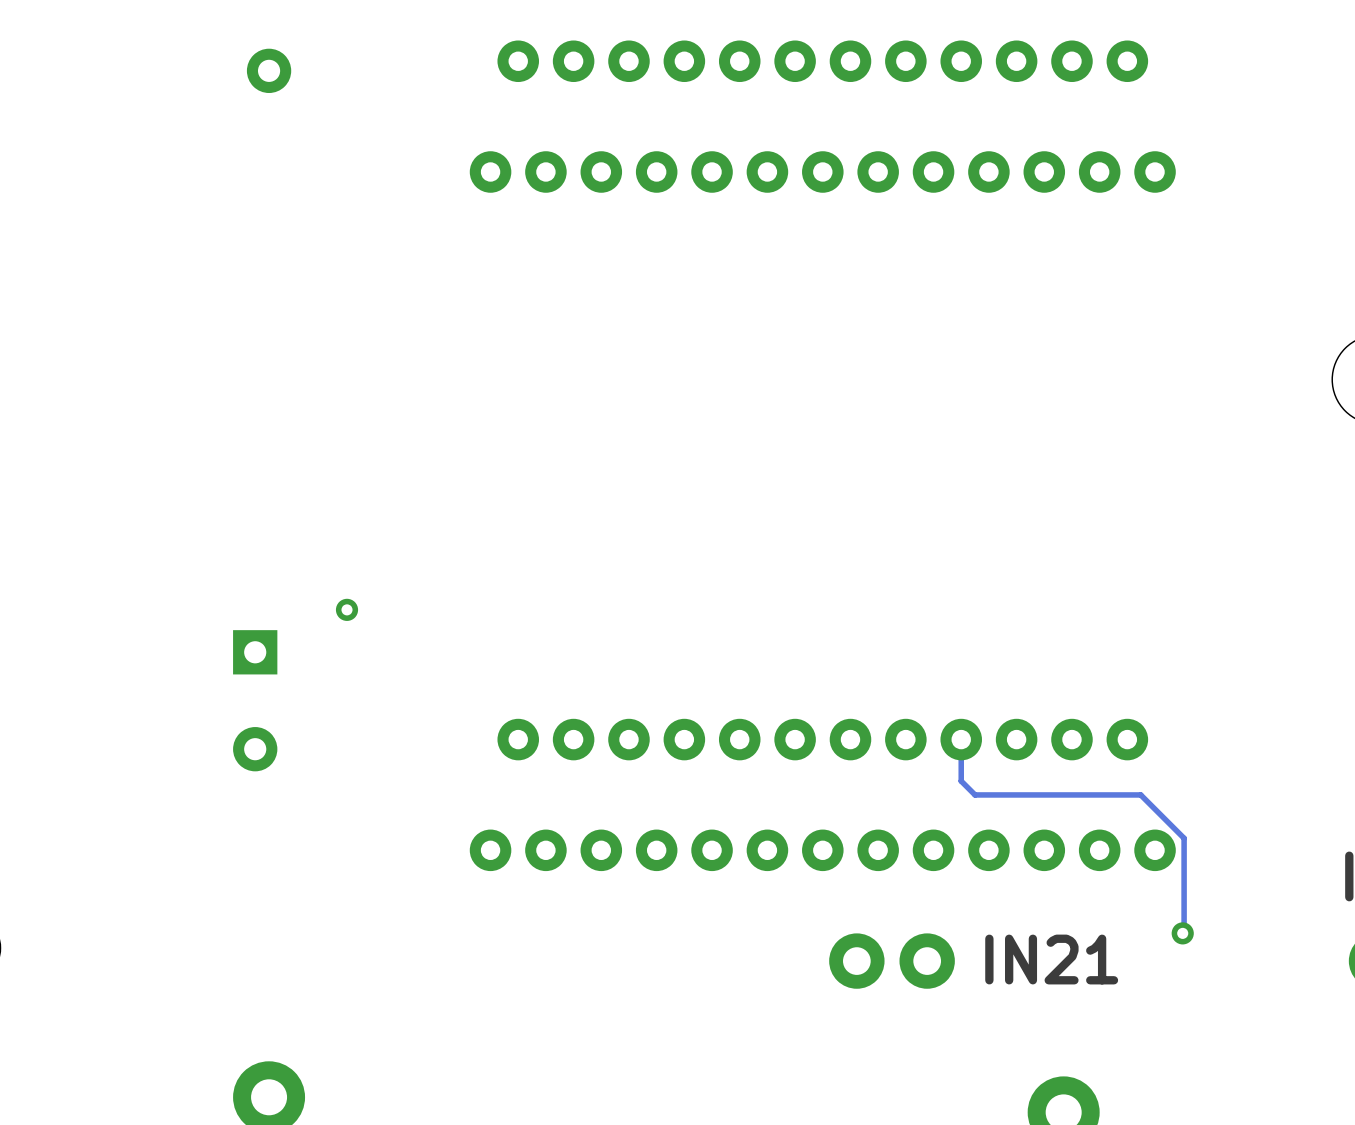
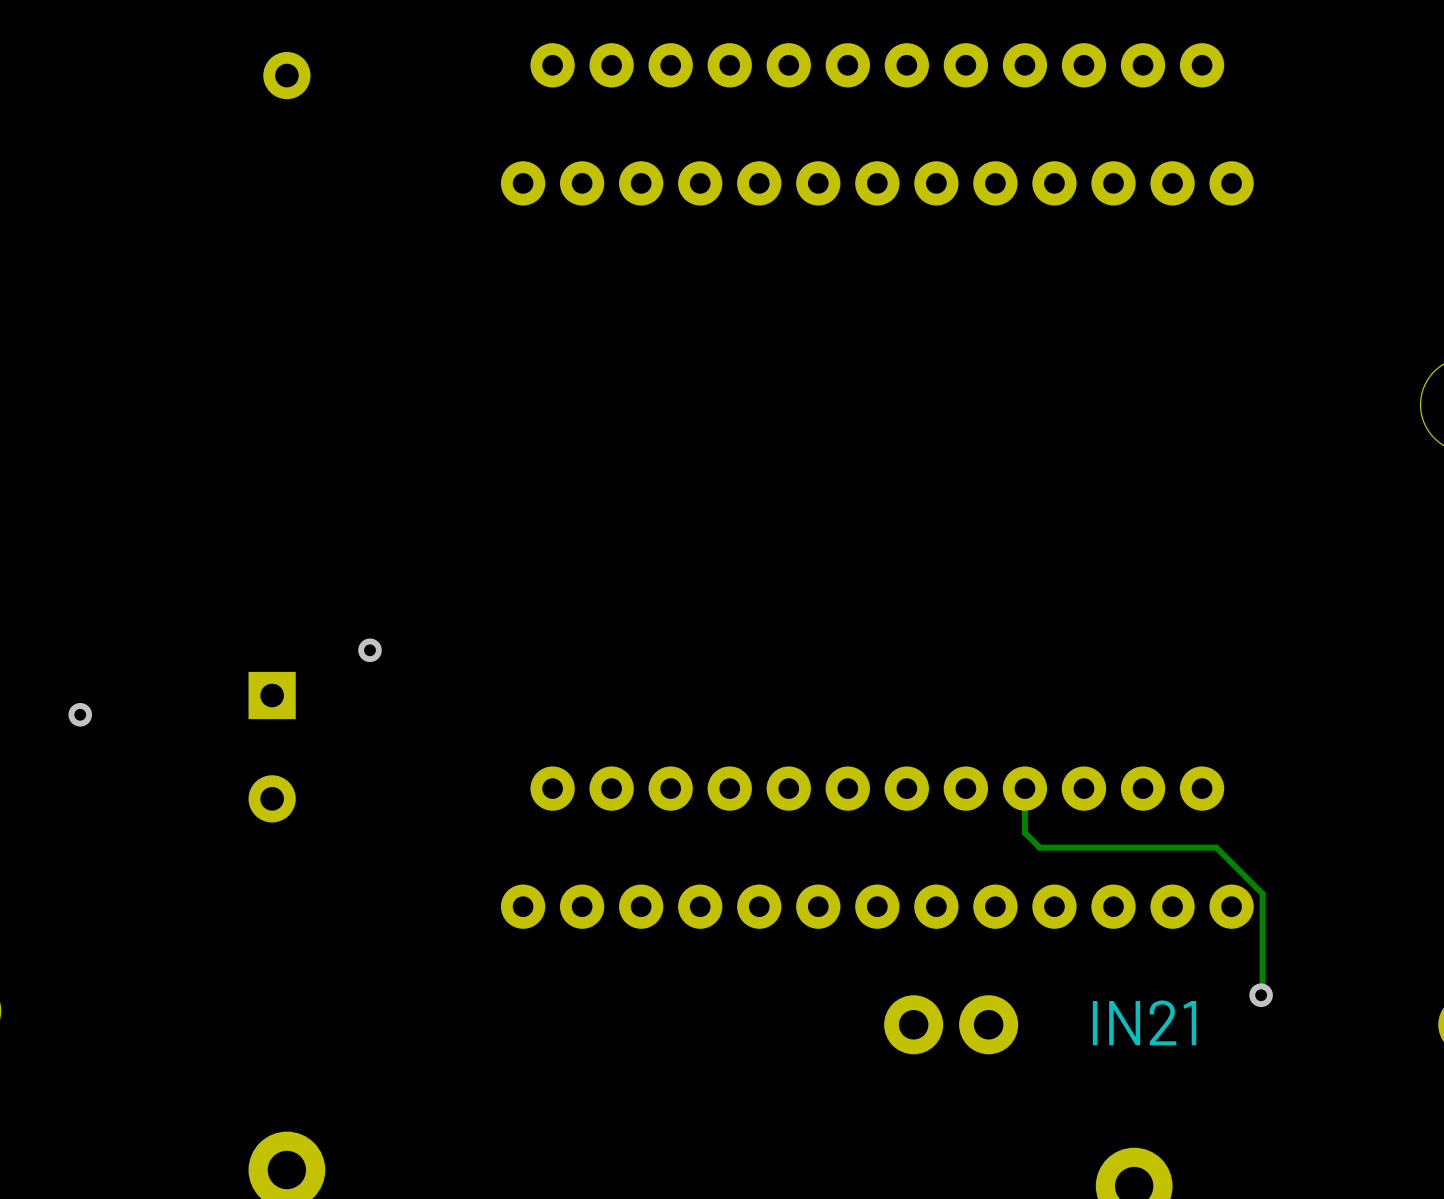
via: none -> (80, 714)

